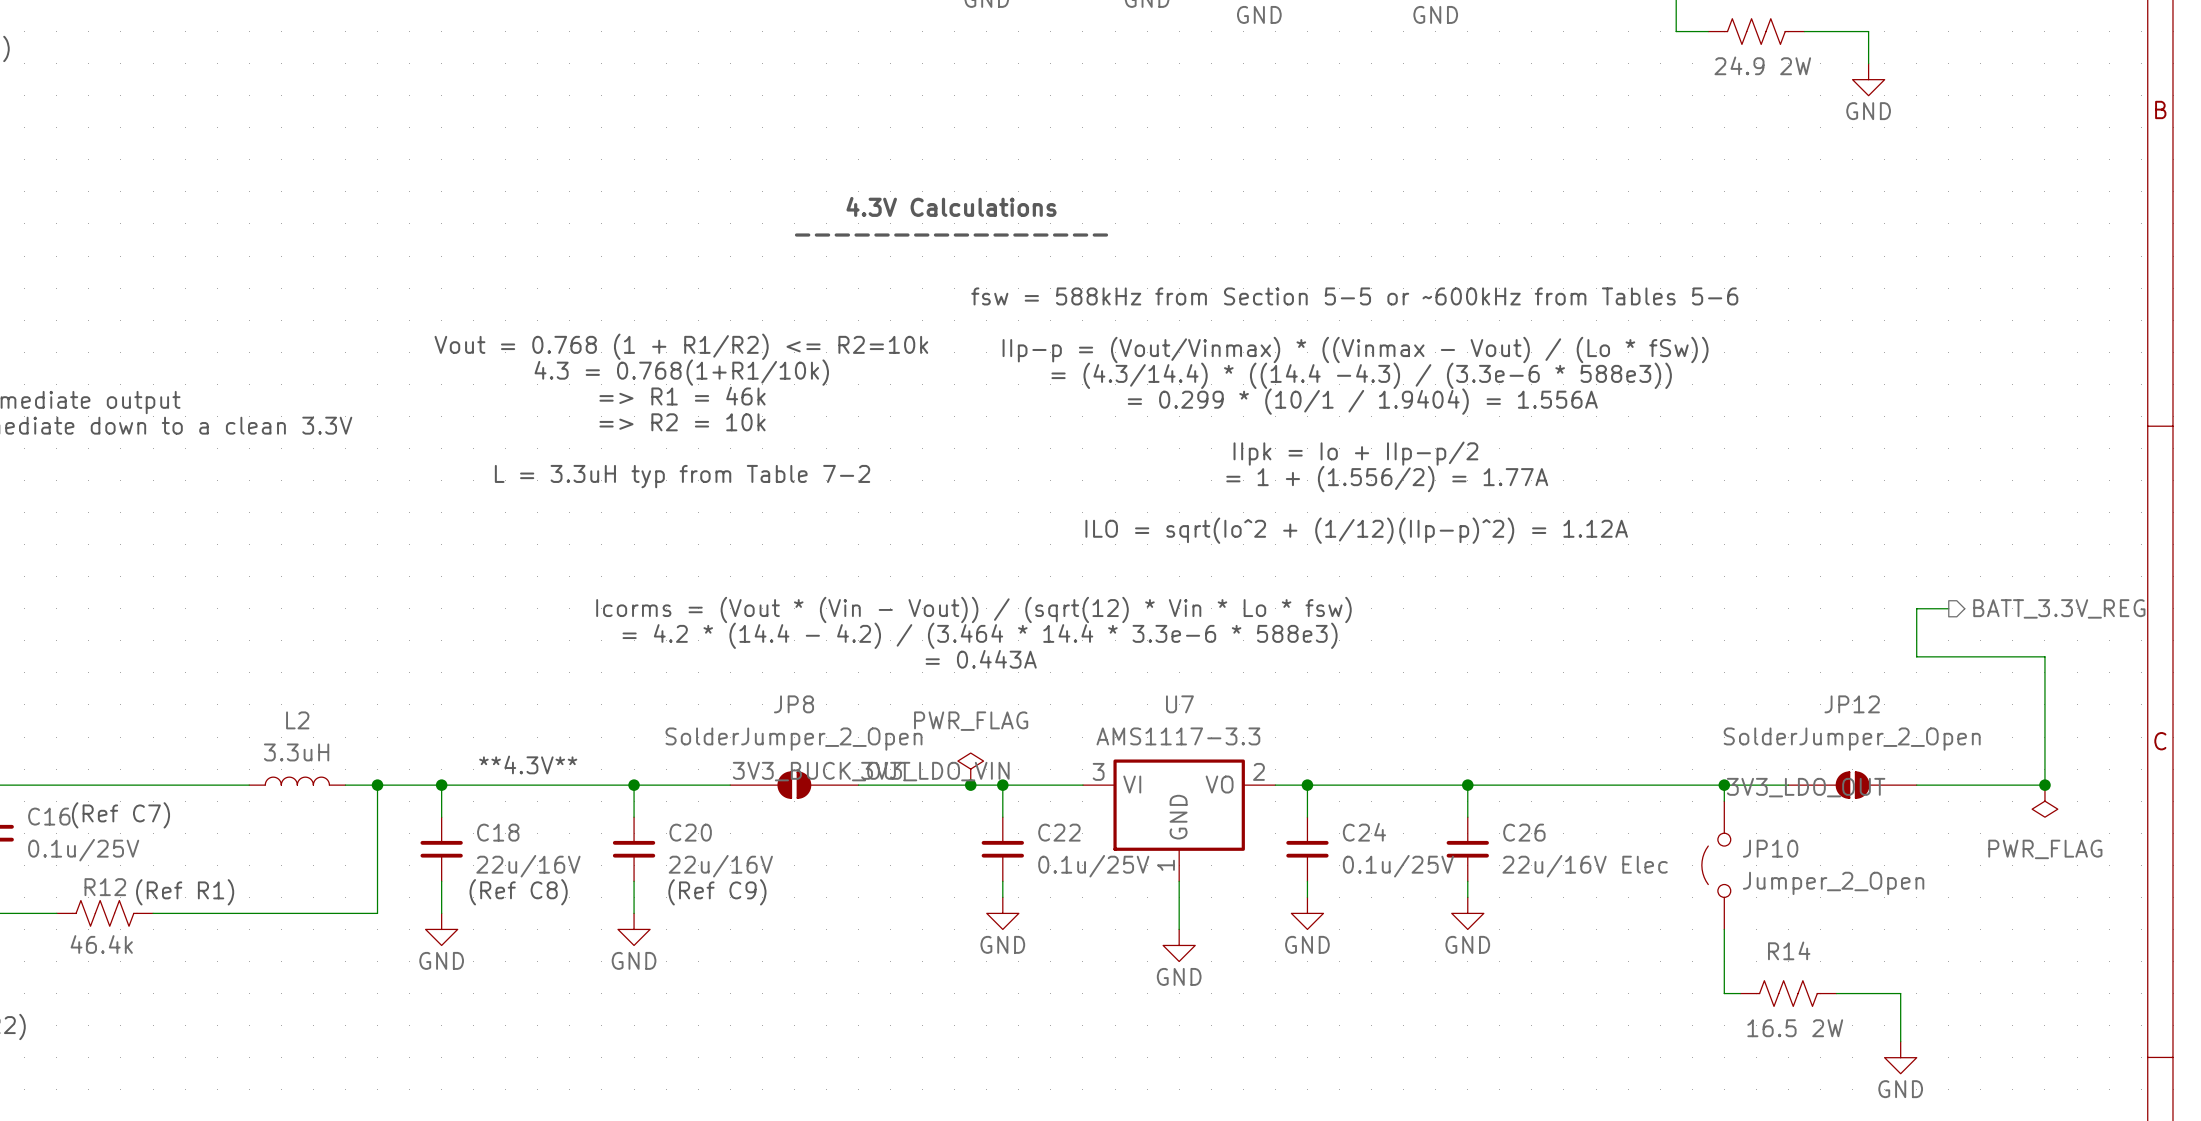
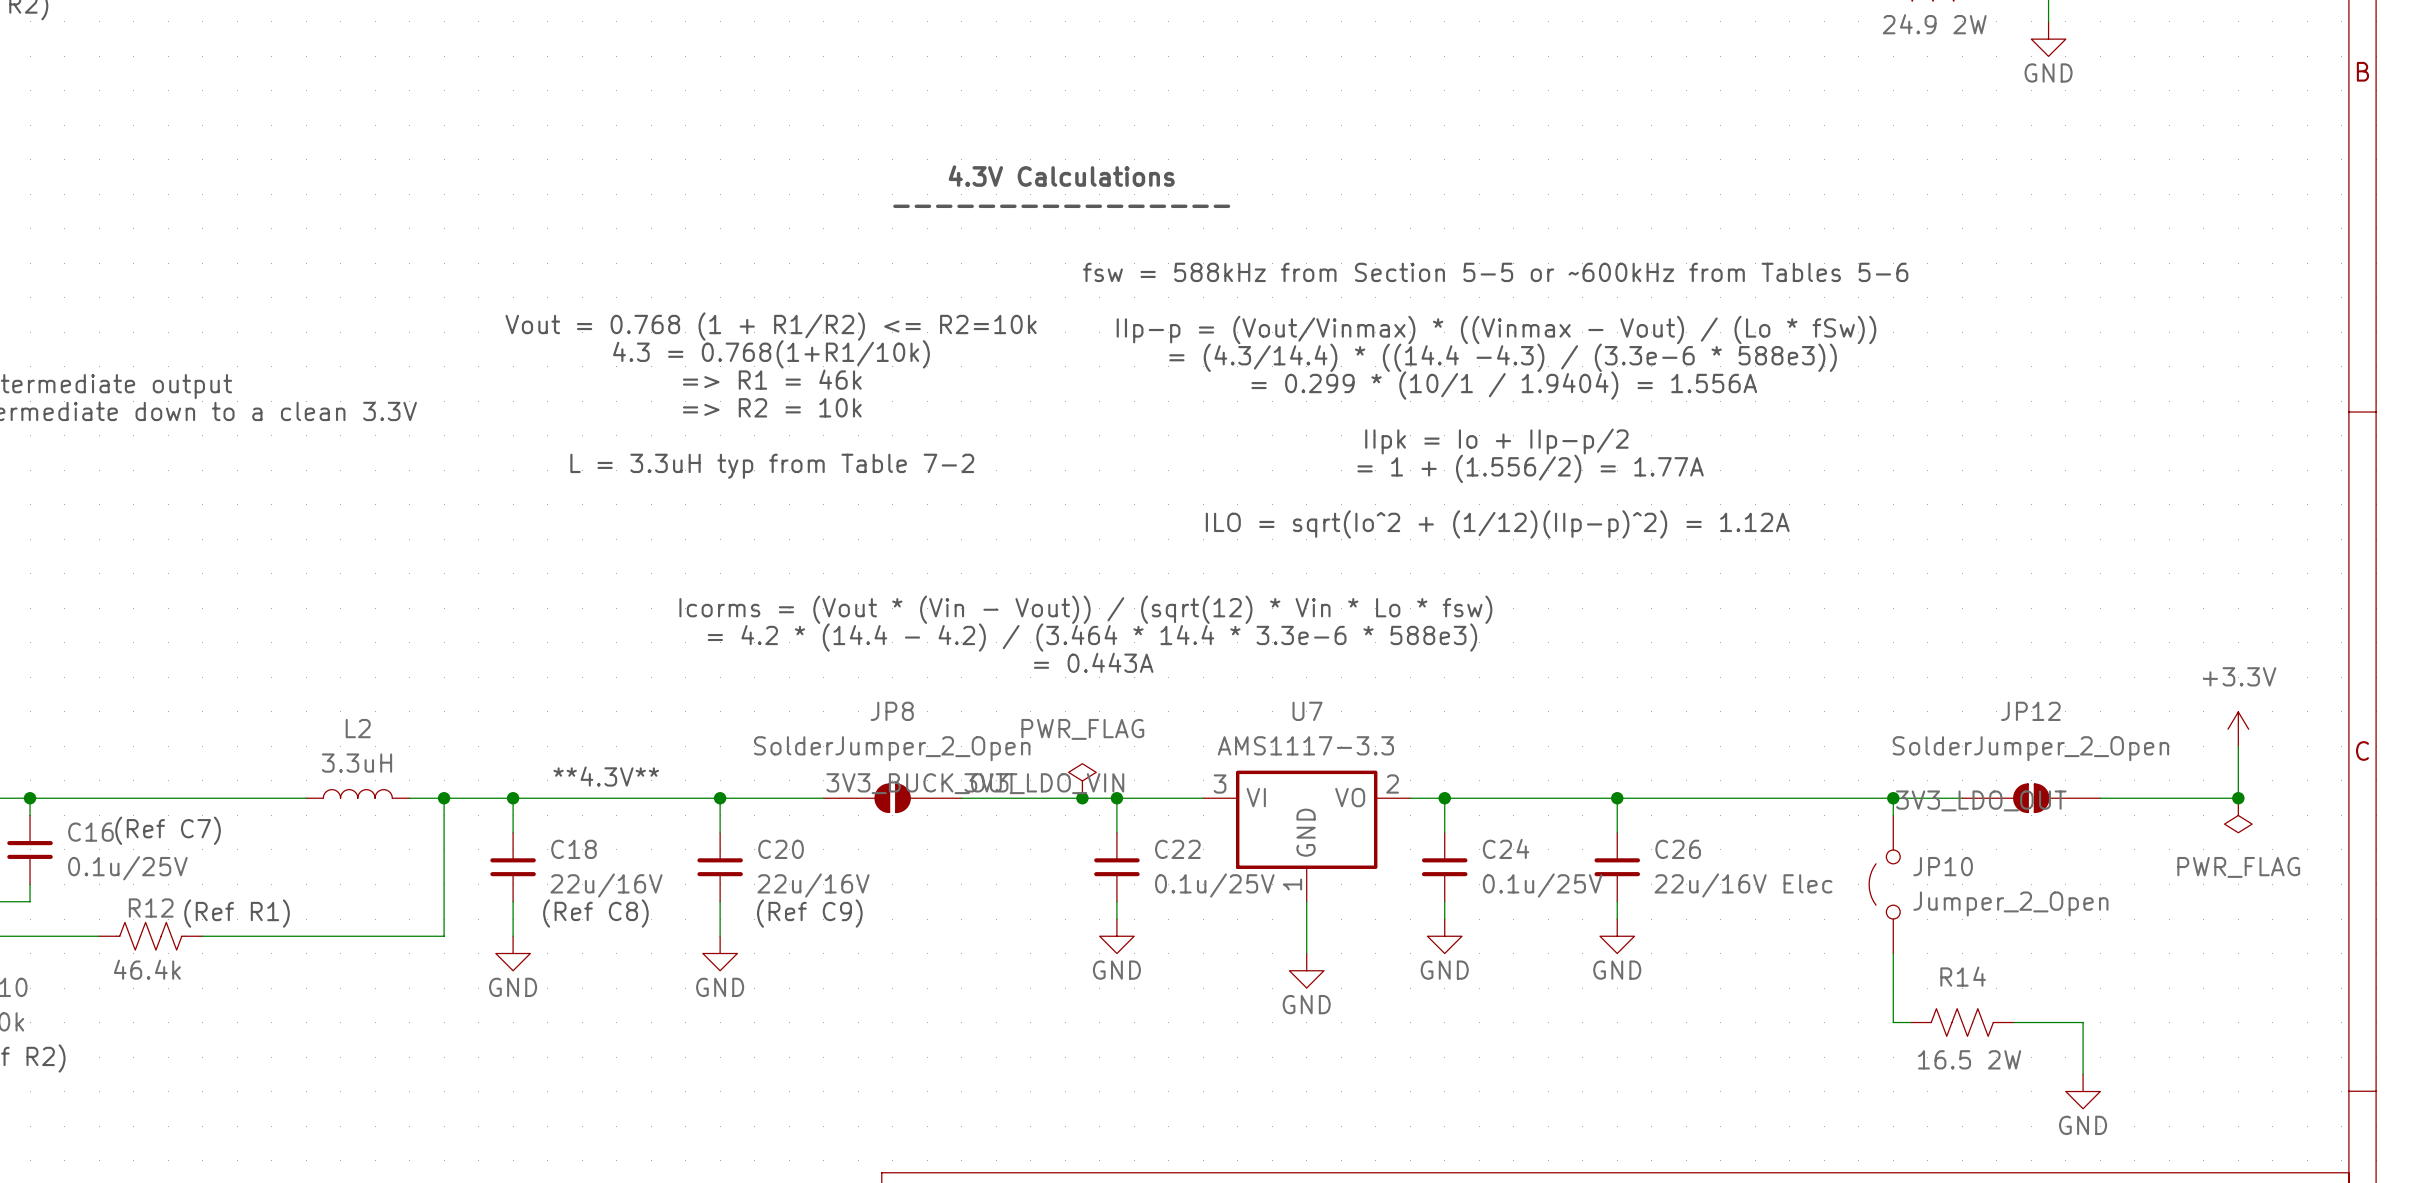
wire: (1948, 608) (1916, 608) (1916, 656) (2044, 656) (2044, 737) -> none
hierarchical label: BATT_3.3V_REG (2059, 608) -> none
power symbol: none -> +3.3V (2238, 729)

